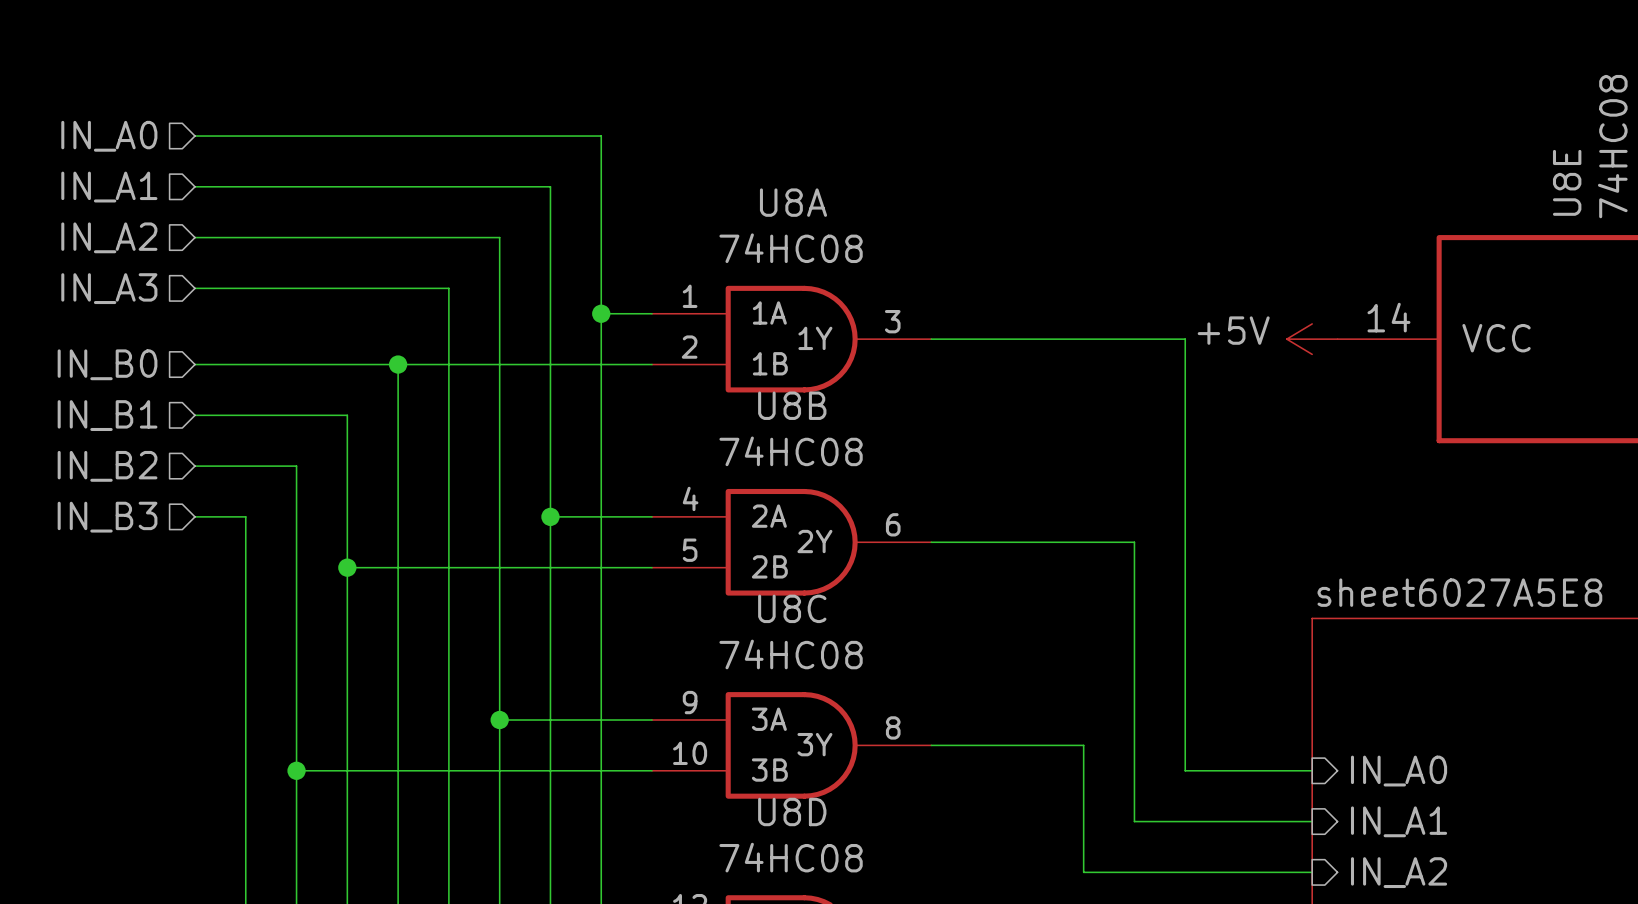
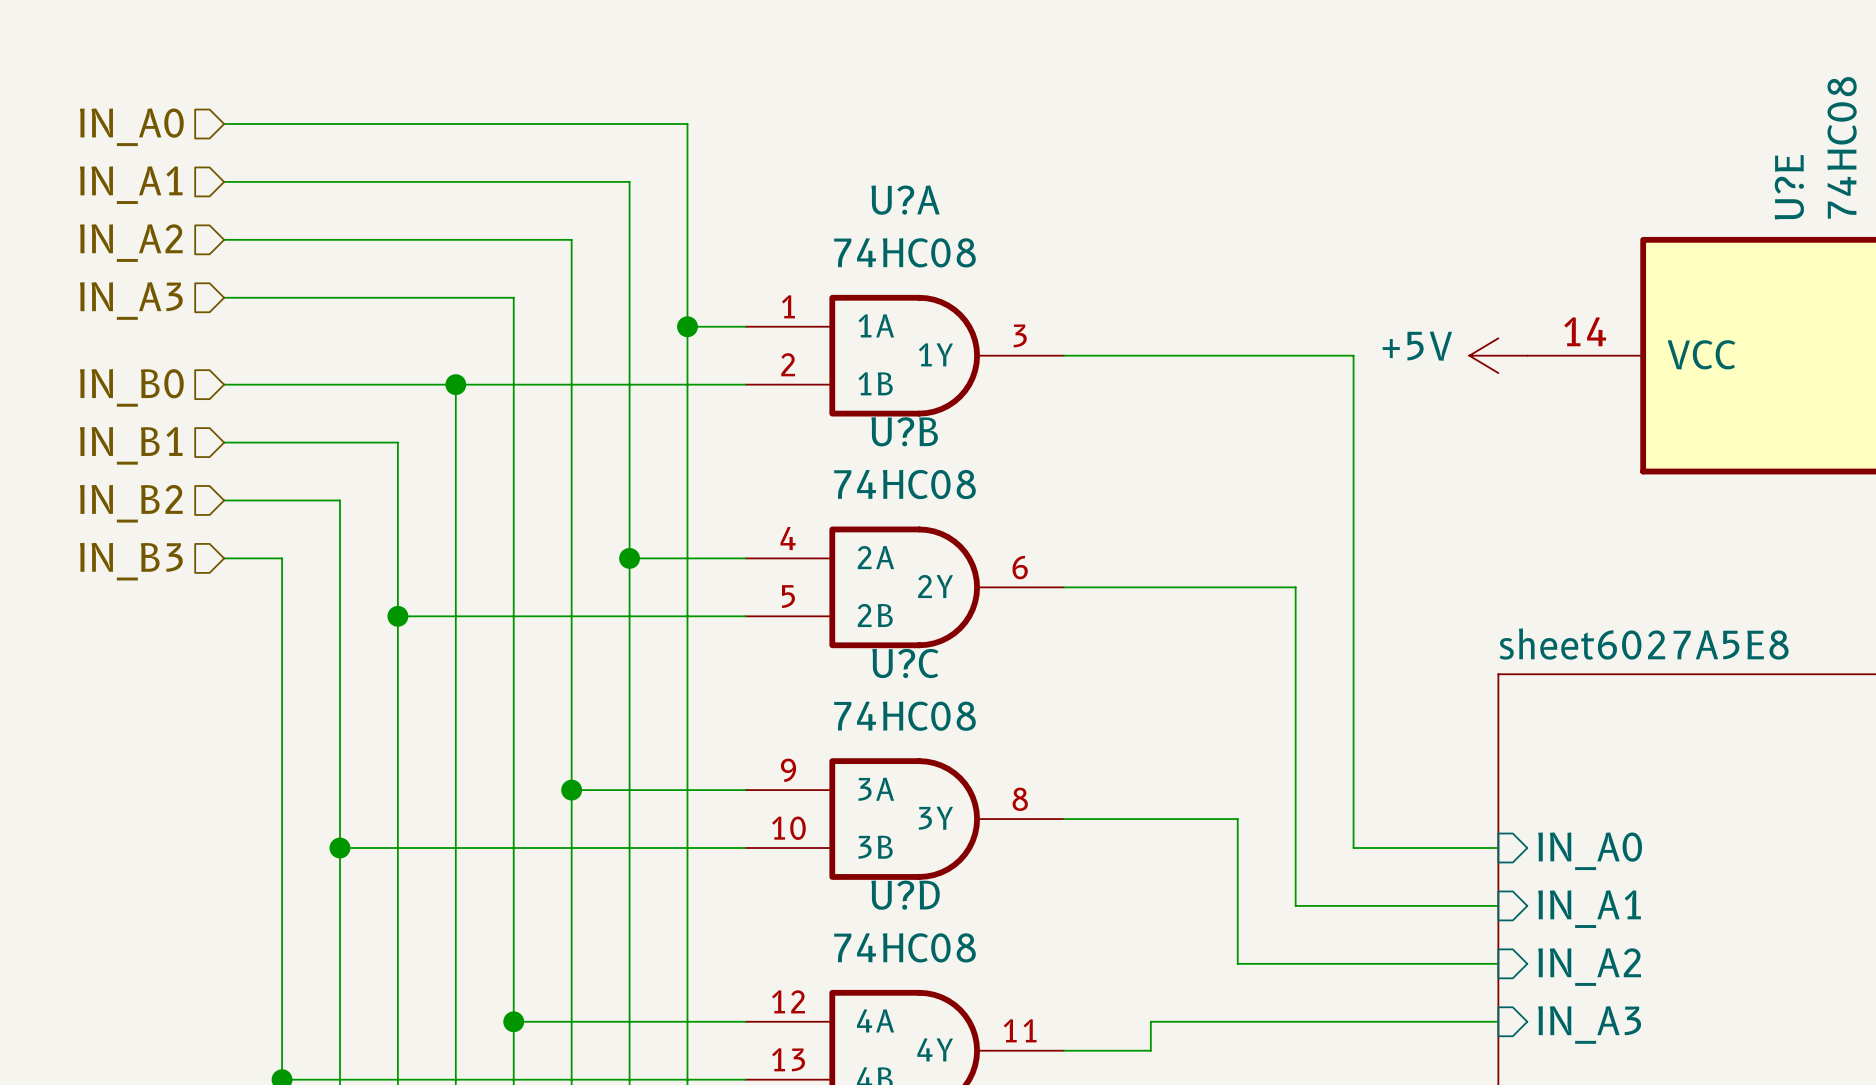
U8E name: U8E (1567, 182) -> U?E (1789, 187)
U8A name: U8A (793, 202) -> U?A (905, 200)
U8B name: U8B (792, 405) -> U?B (904, 431)
U8C name: U8C (792, 608) -> U?C (905, 663)
U8D name: U8D (792, 811) -> U?D (905, 895)

